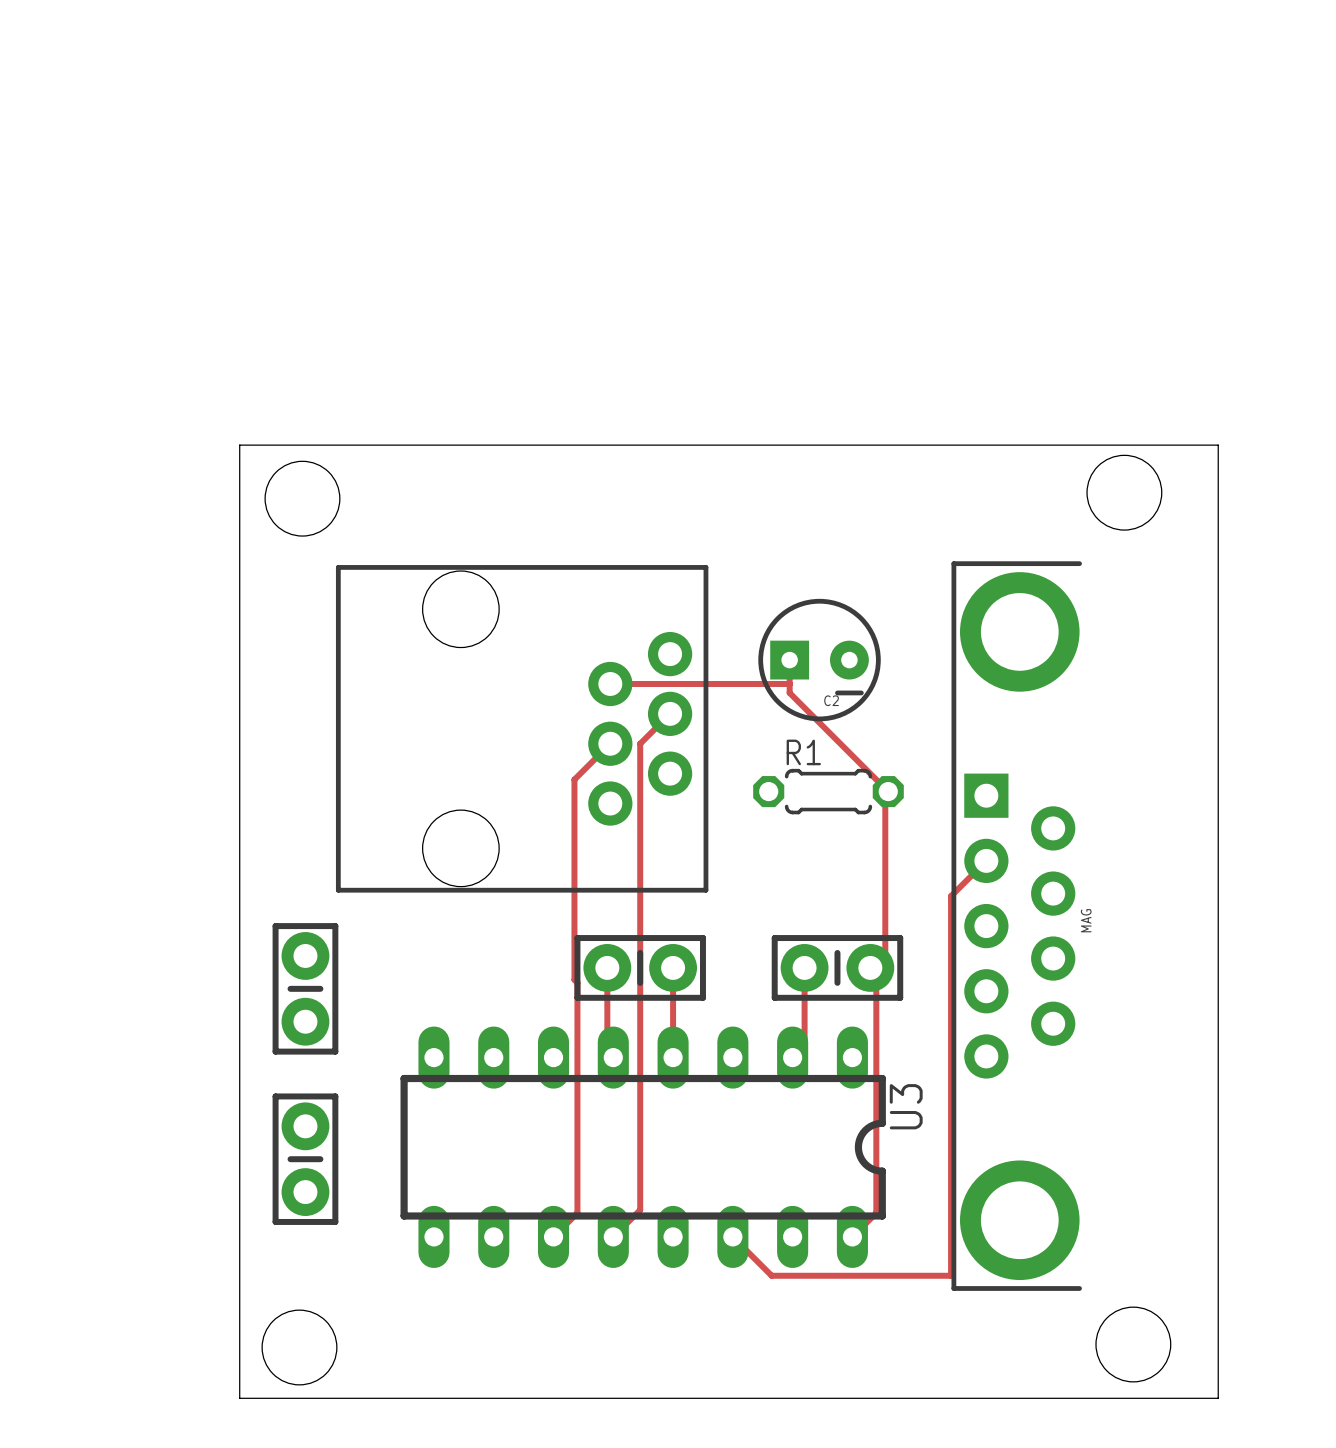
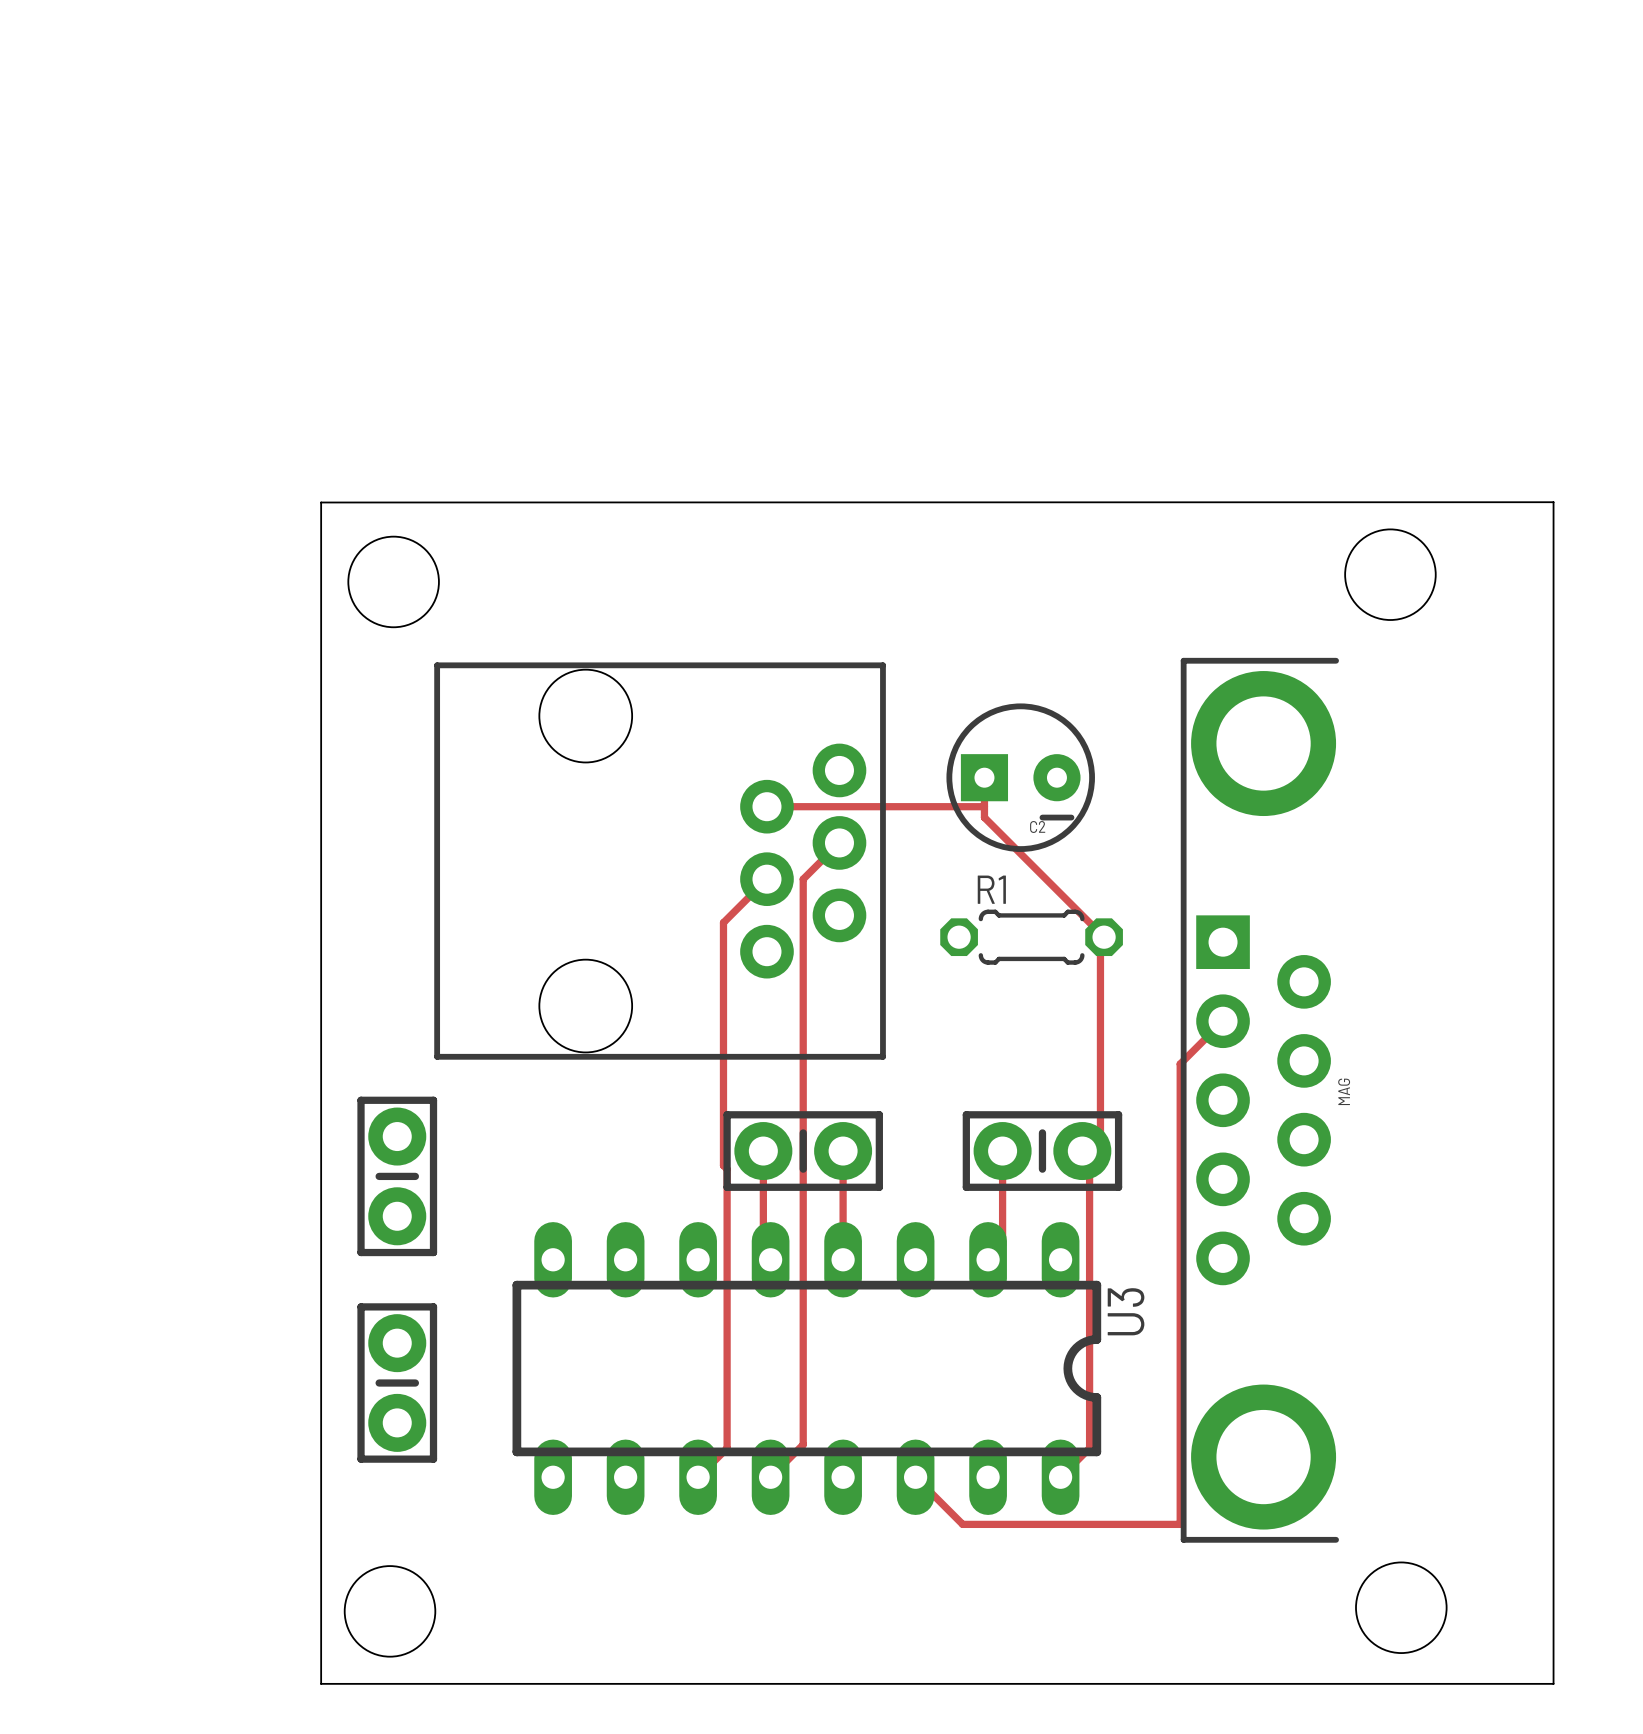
board edge: (239, 445) (1218, 445) (1218, 1398) (239, 1398) (239, 445) -> (1553, 502) (321, 502) (321, 1683) (1553, 1683) (1553, 502)

